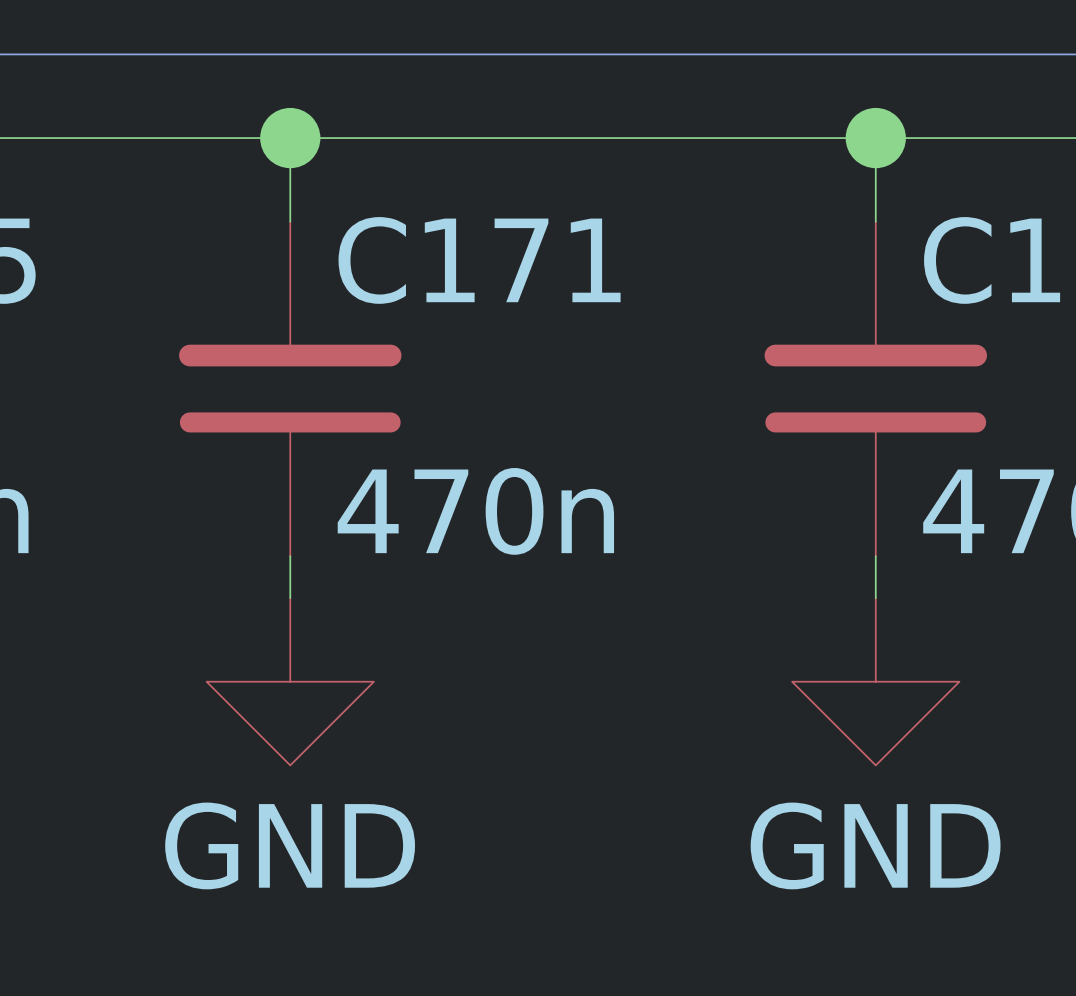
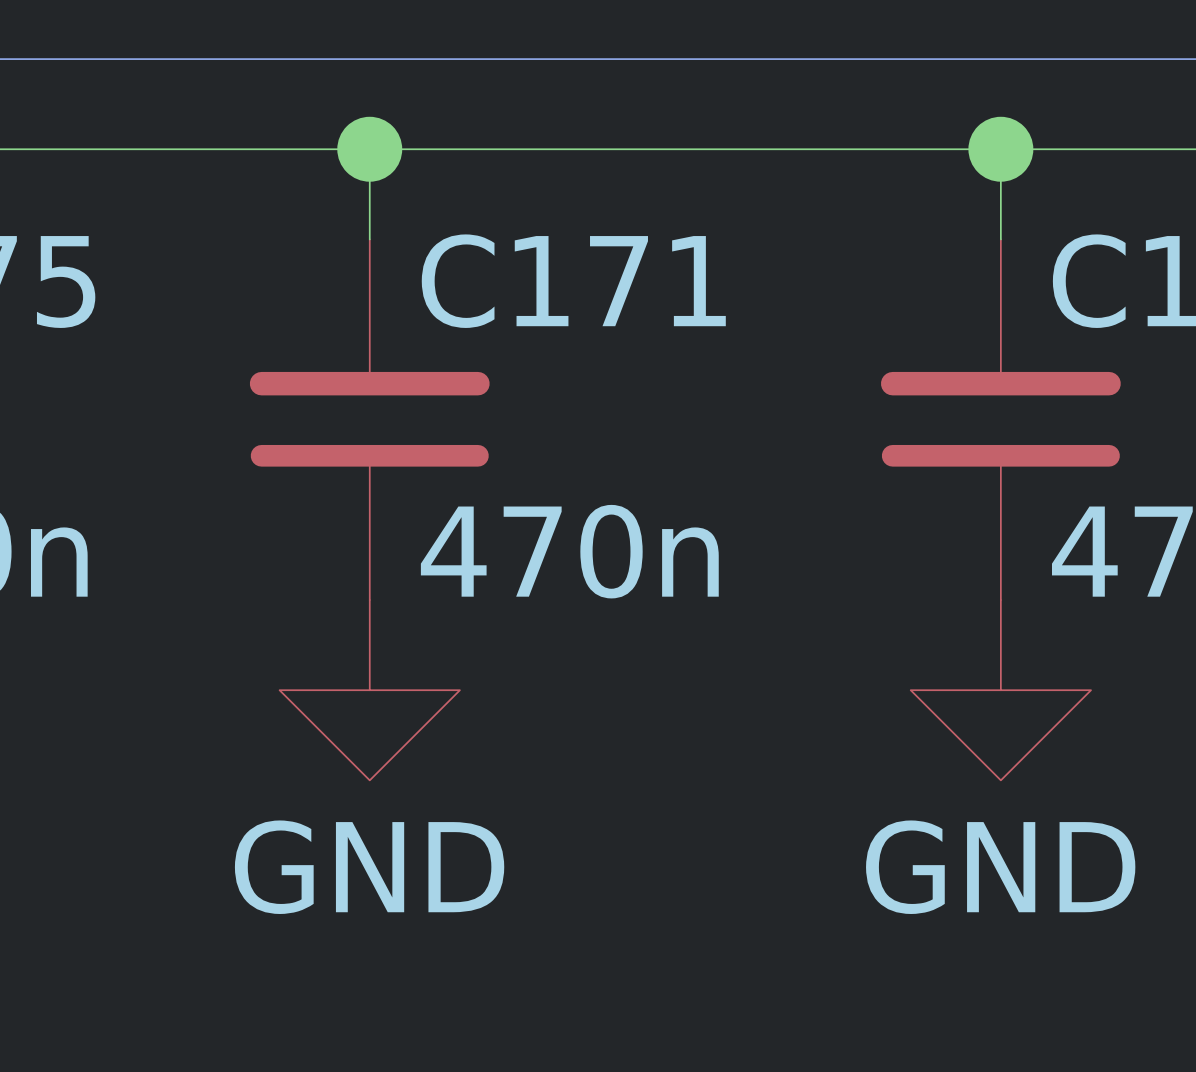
power symbol position: GND (290, 681) -> GND (369, 690)
power symbol position: GND (875, 681) -> GND (1000, 690)

